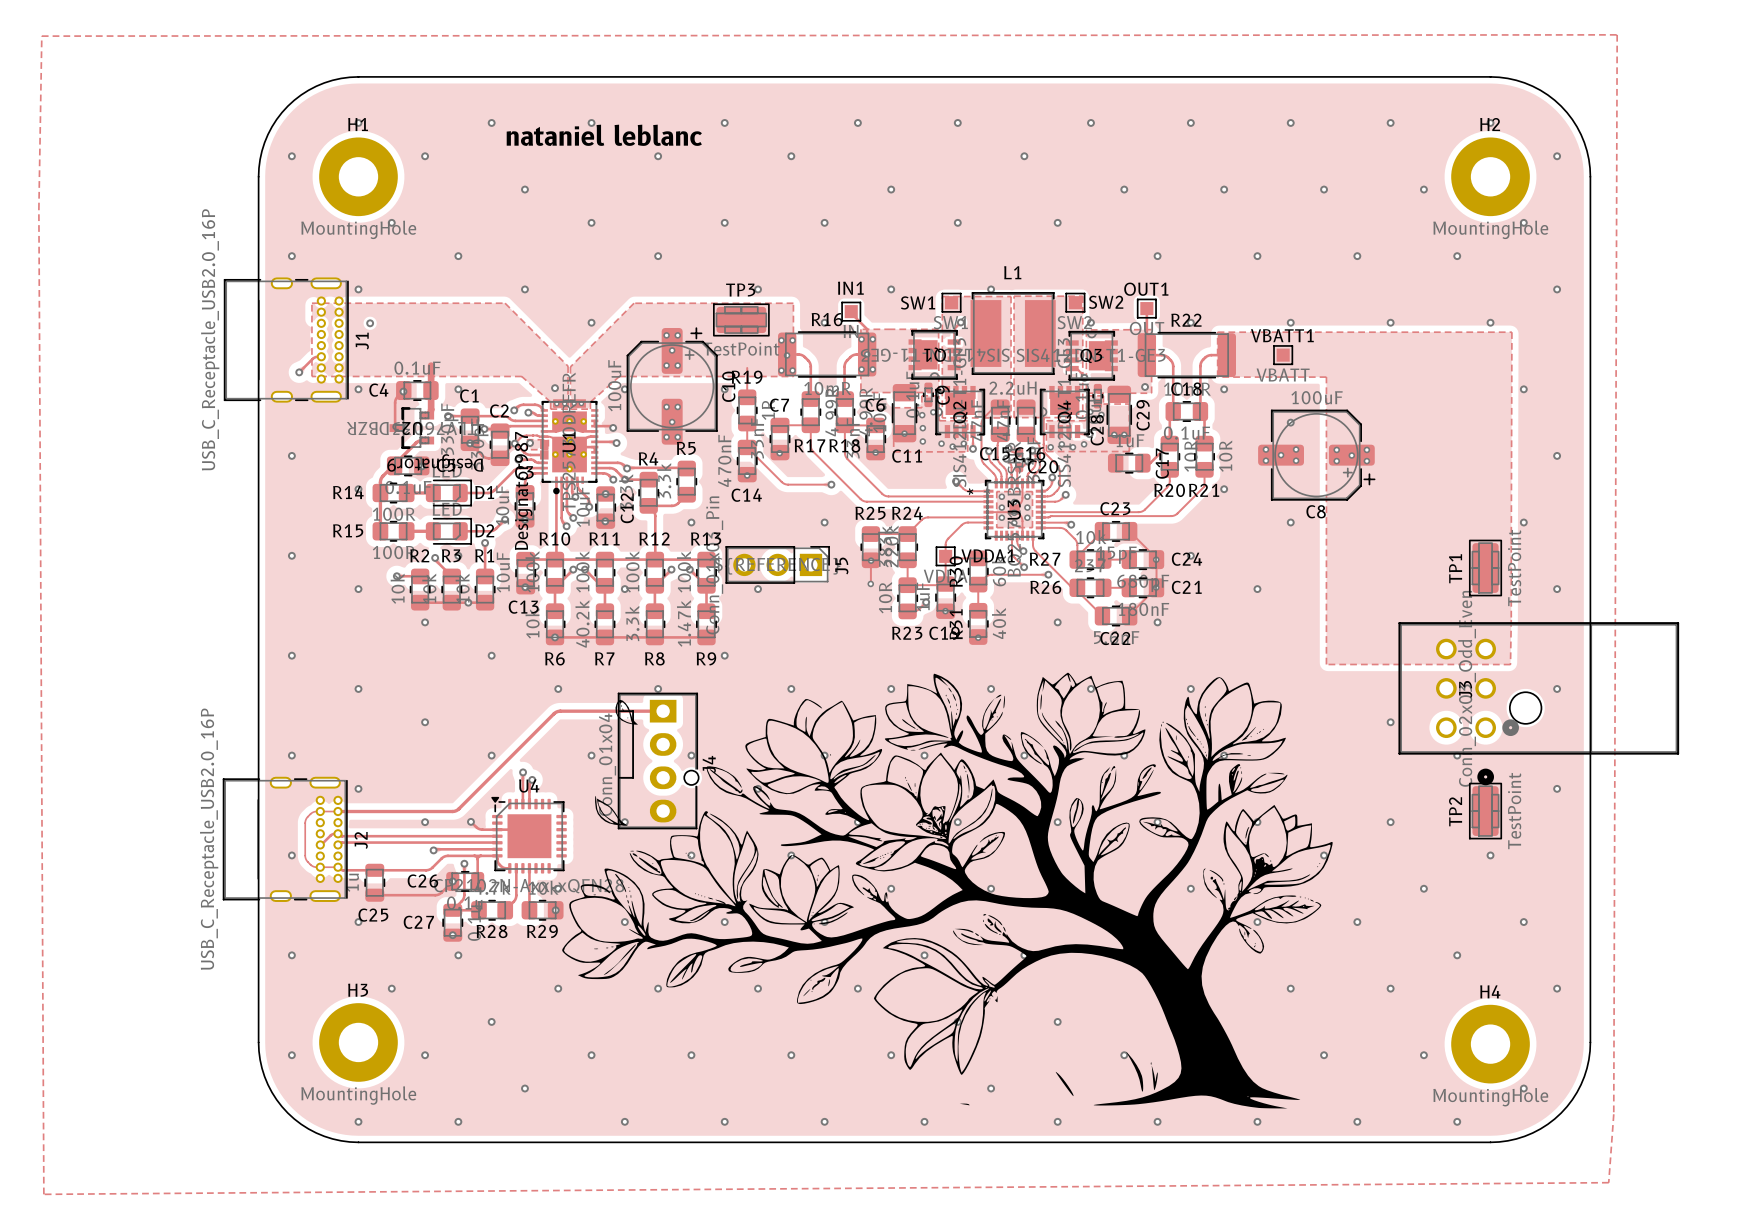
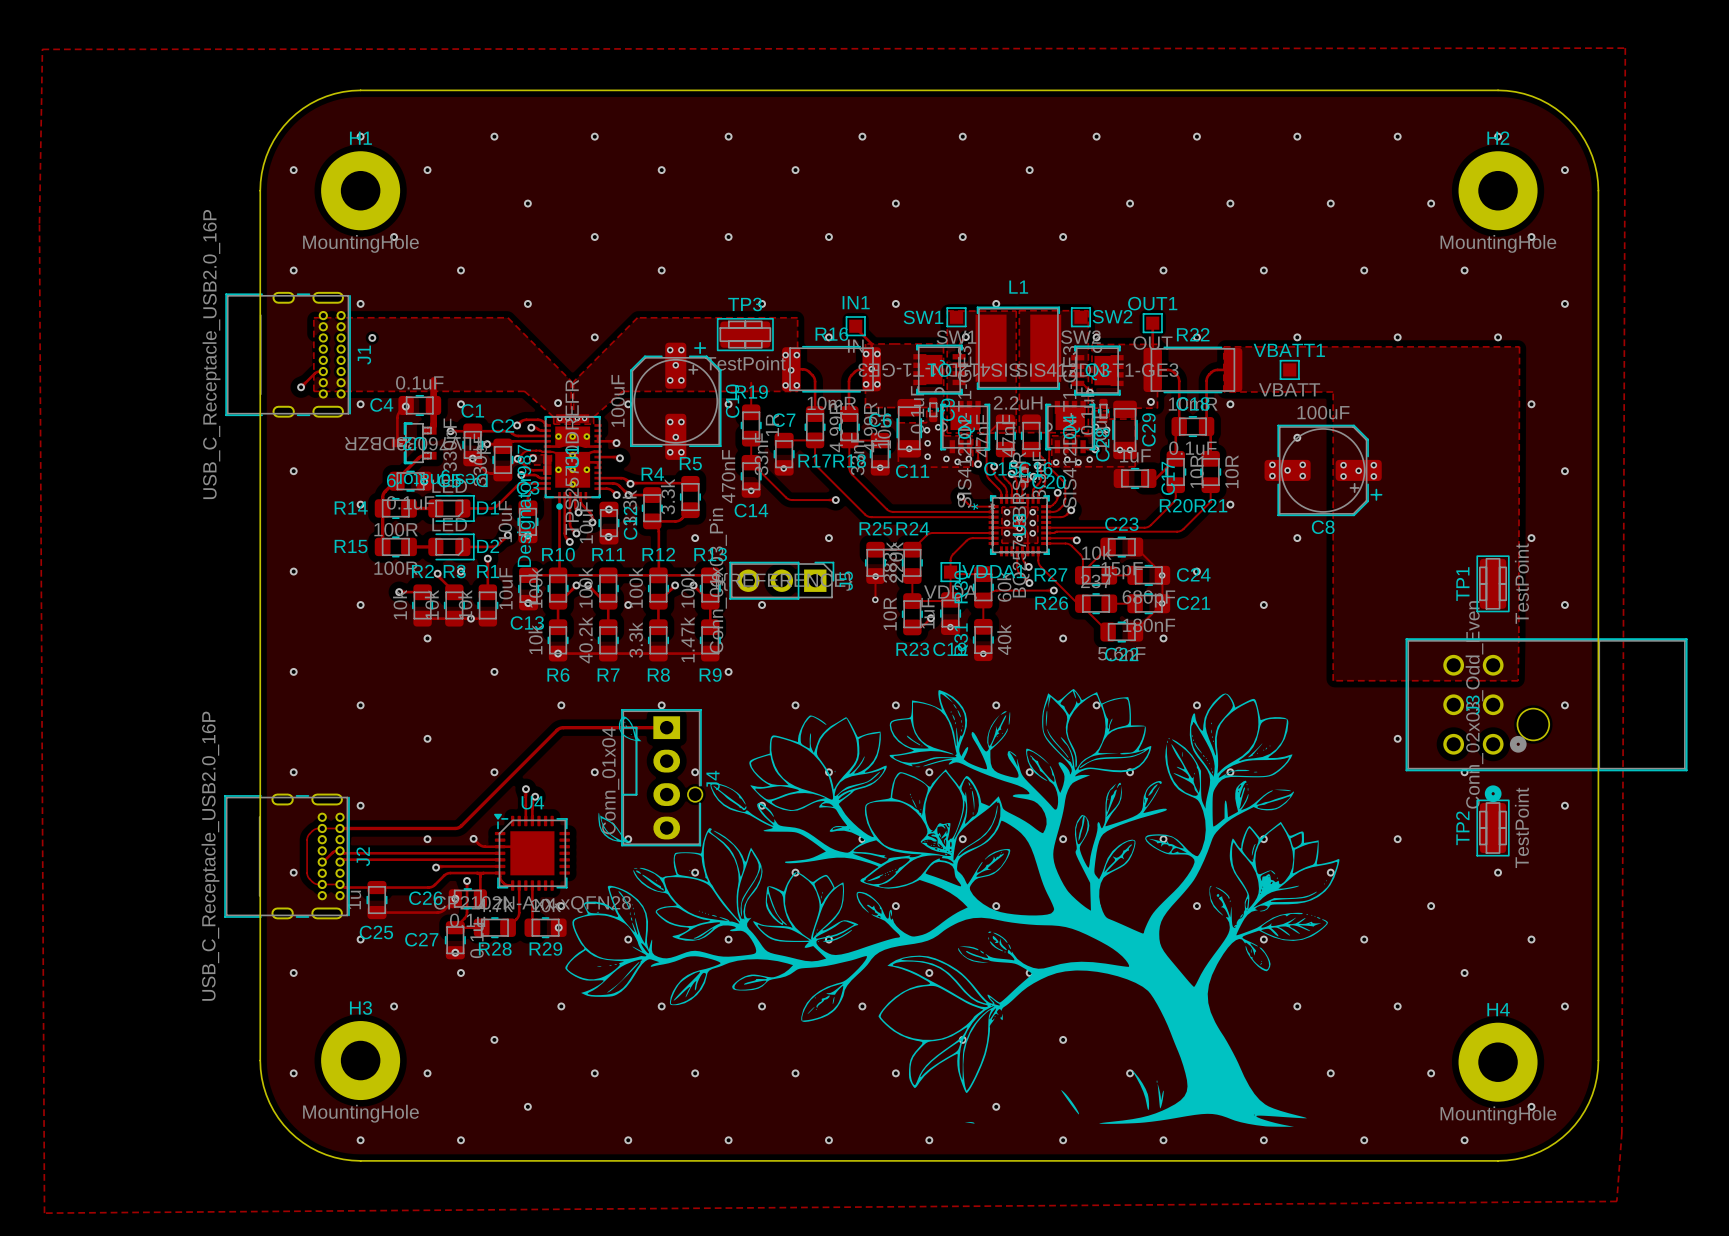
text: nataniel leblanc (604, 135) -> none

